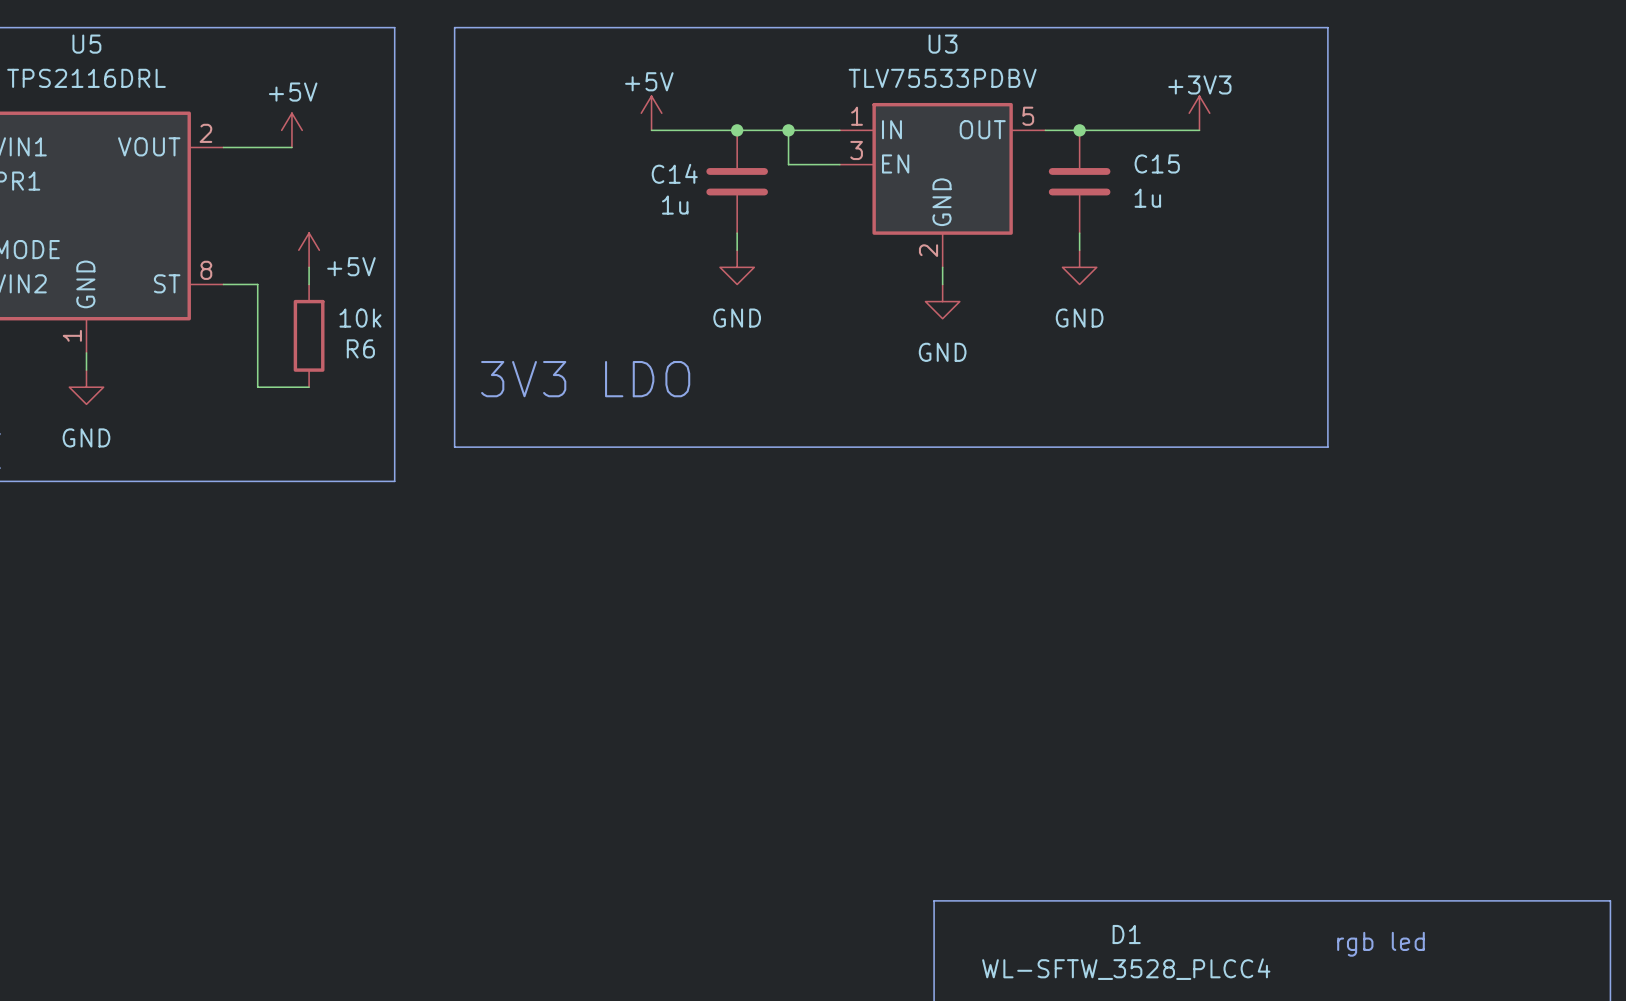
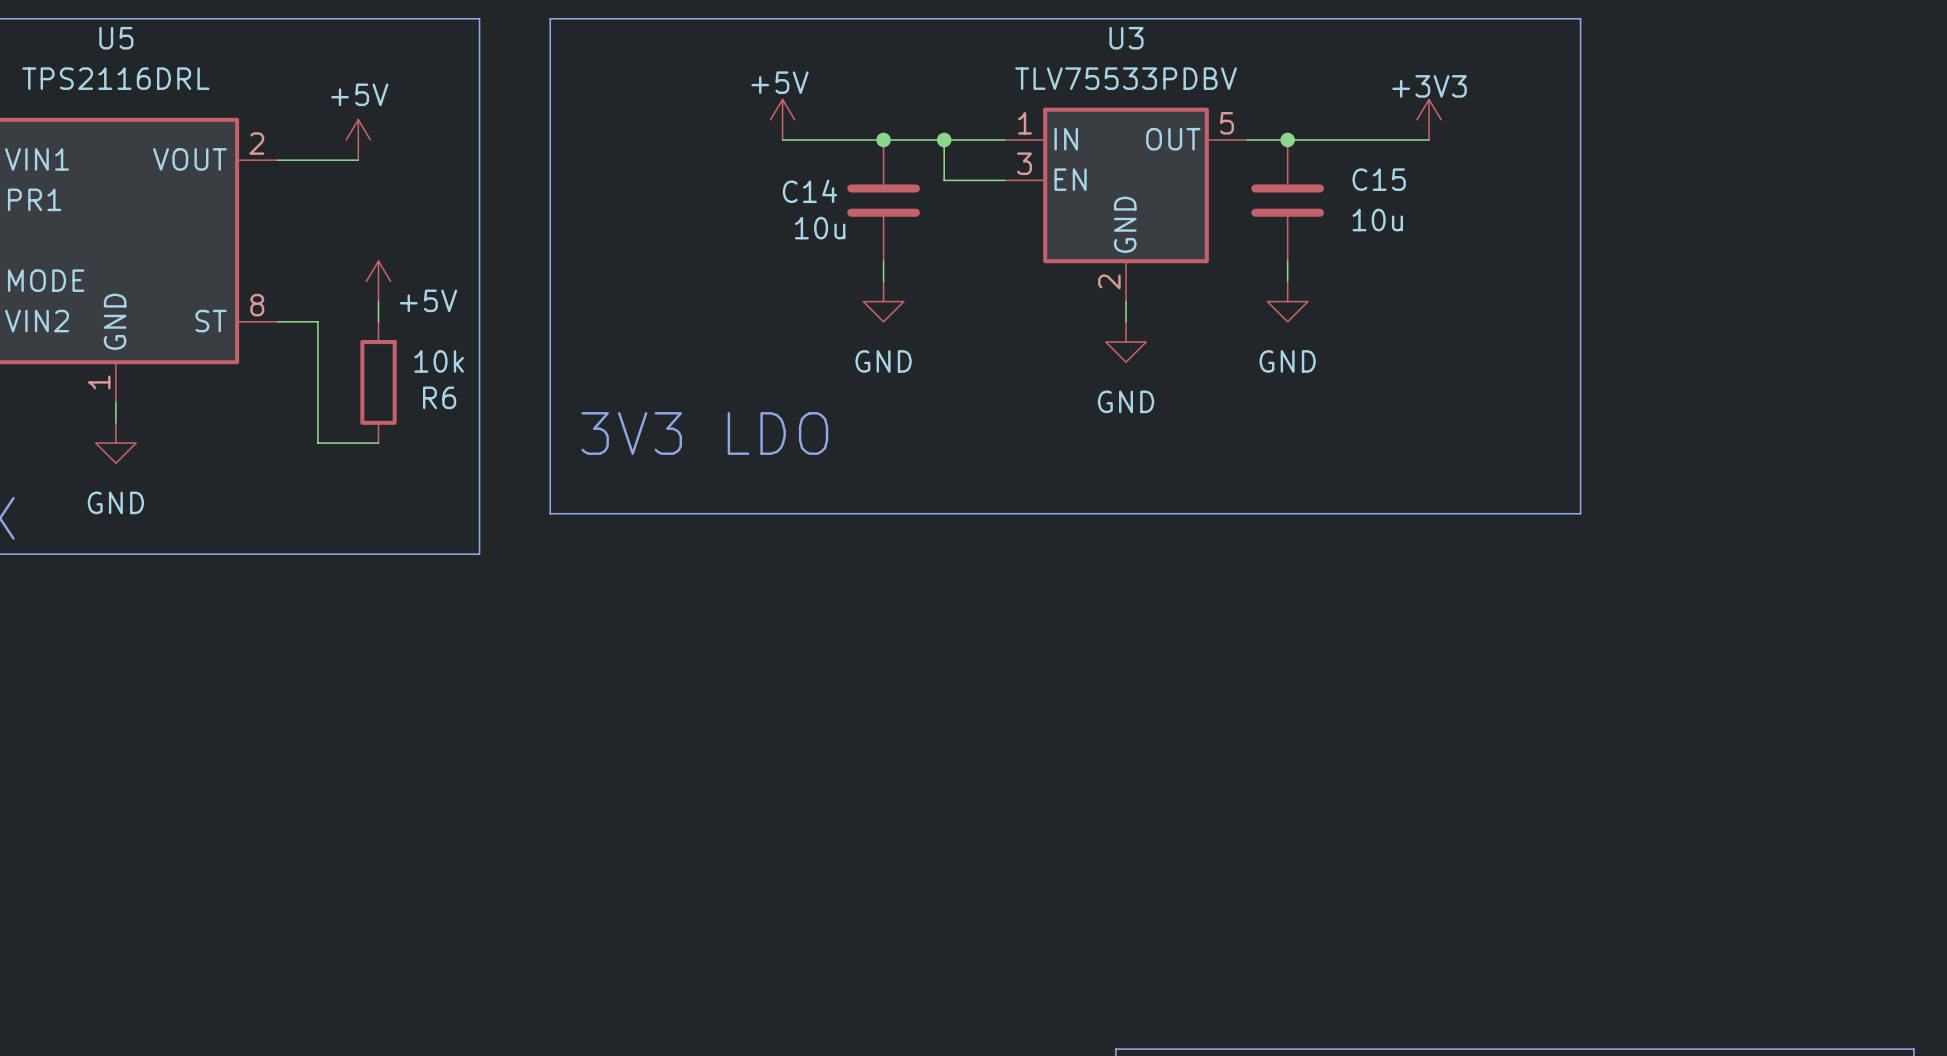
C15 value: 1u (1147, 198) -> 10u (1377, 220)
C14 value: 1u (675, 205) -> 10u (820, 228)

